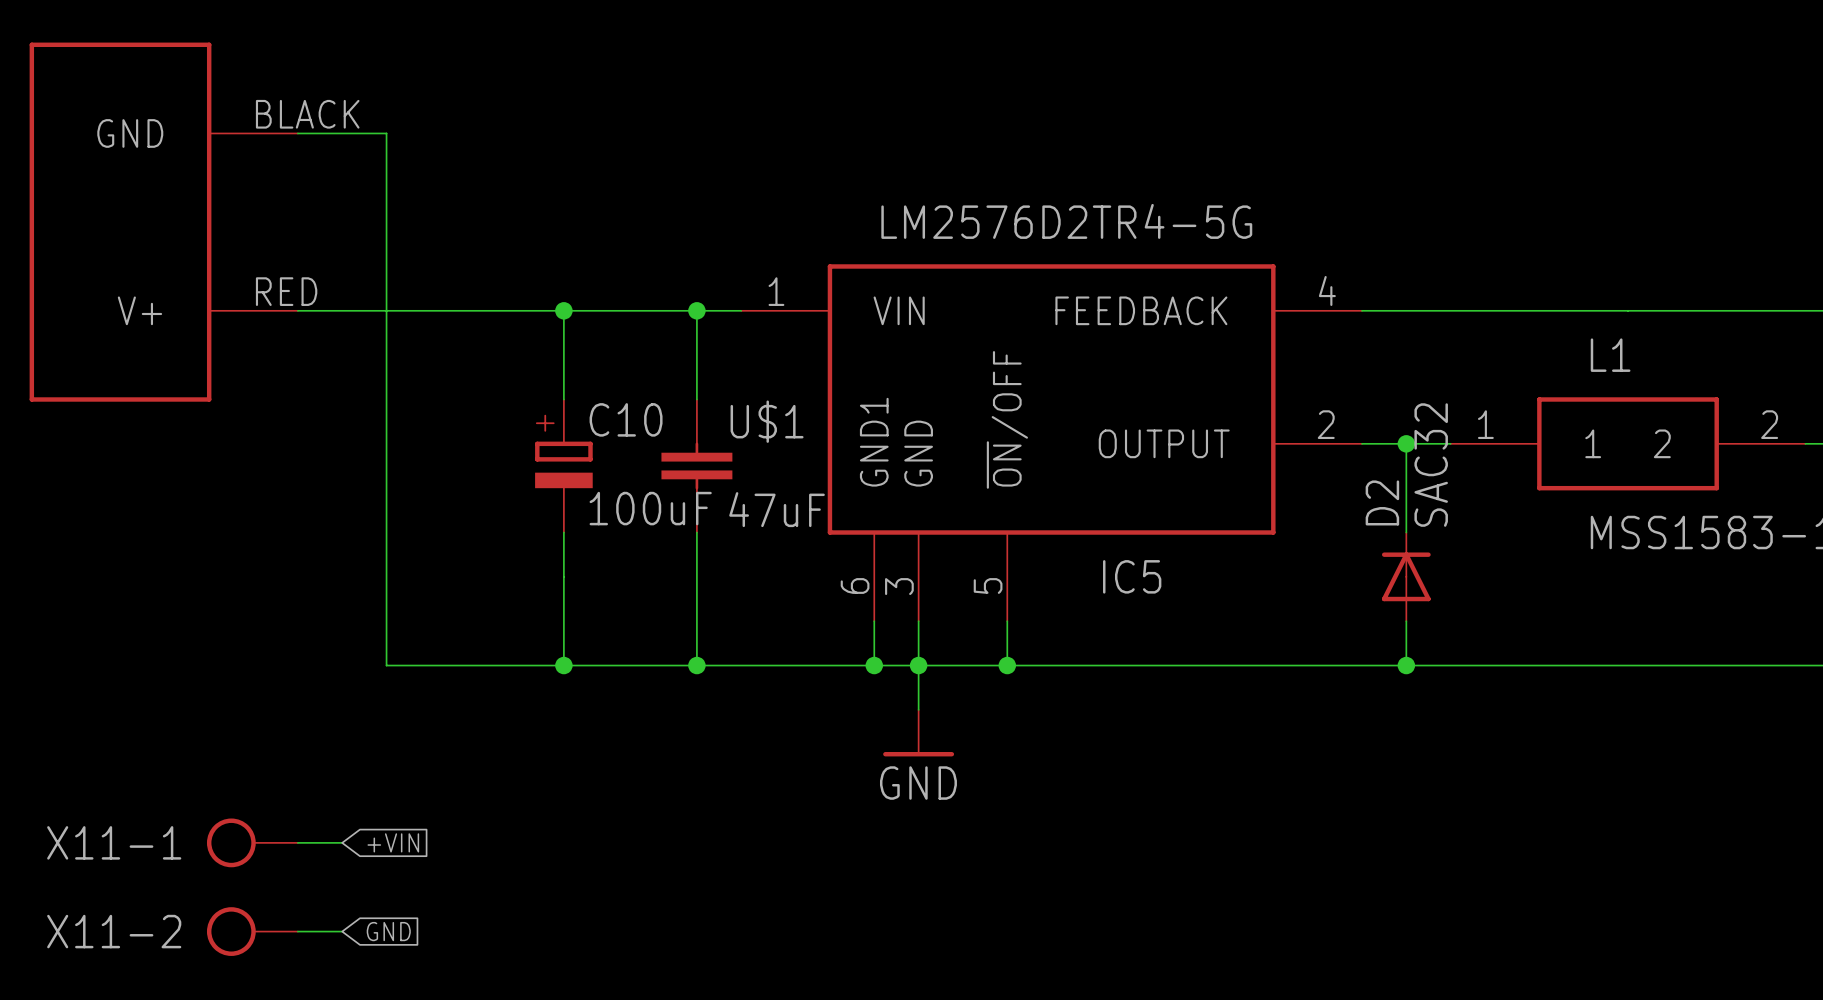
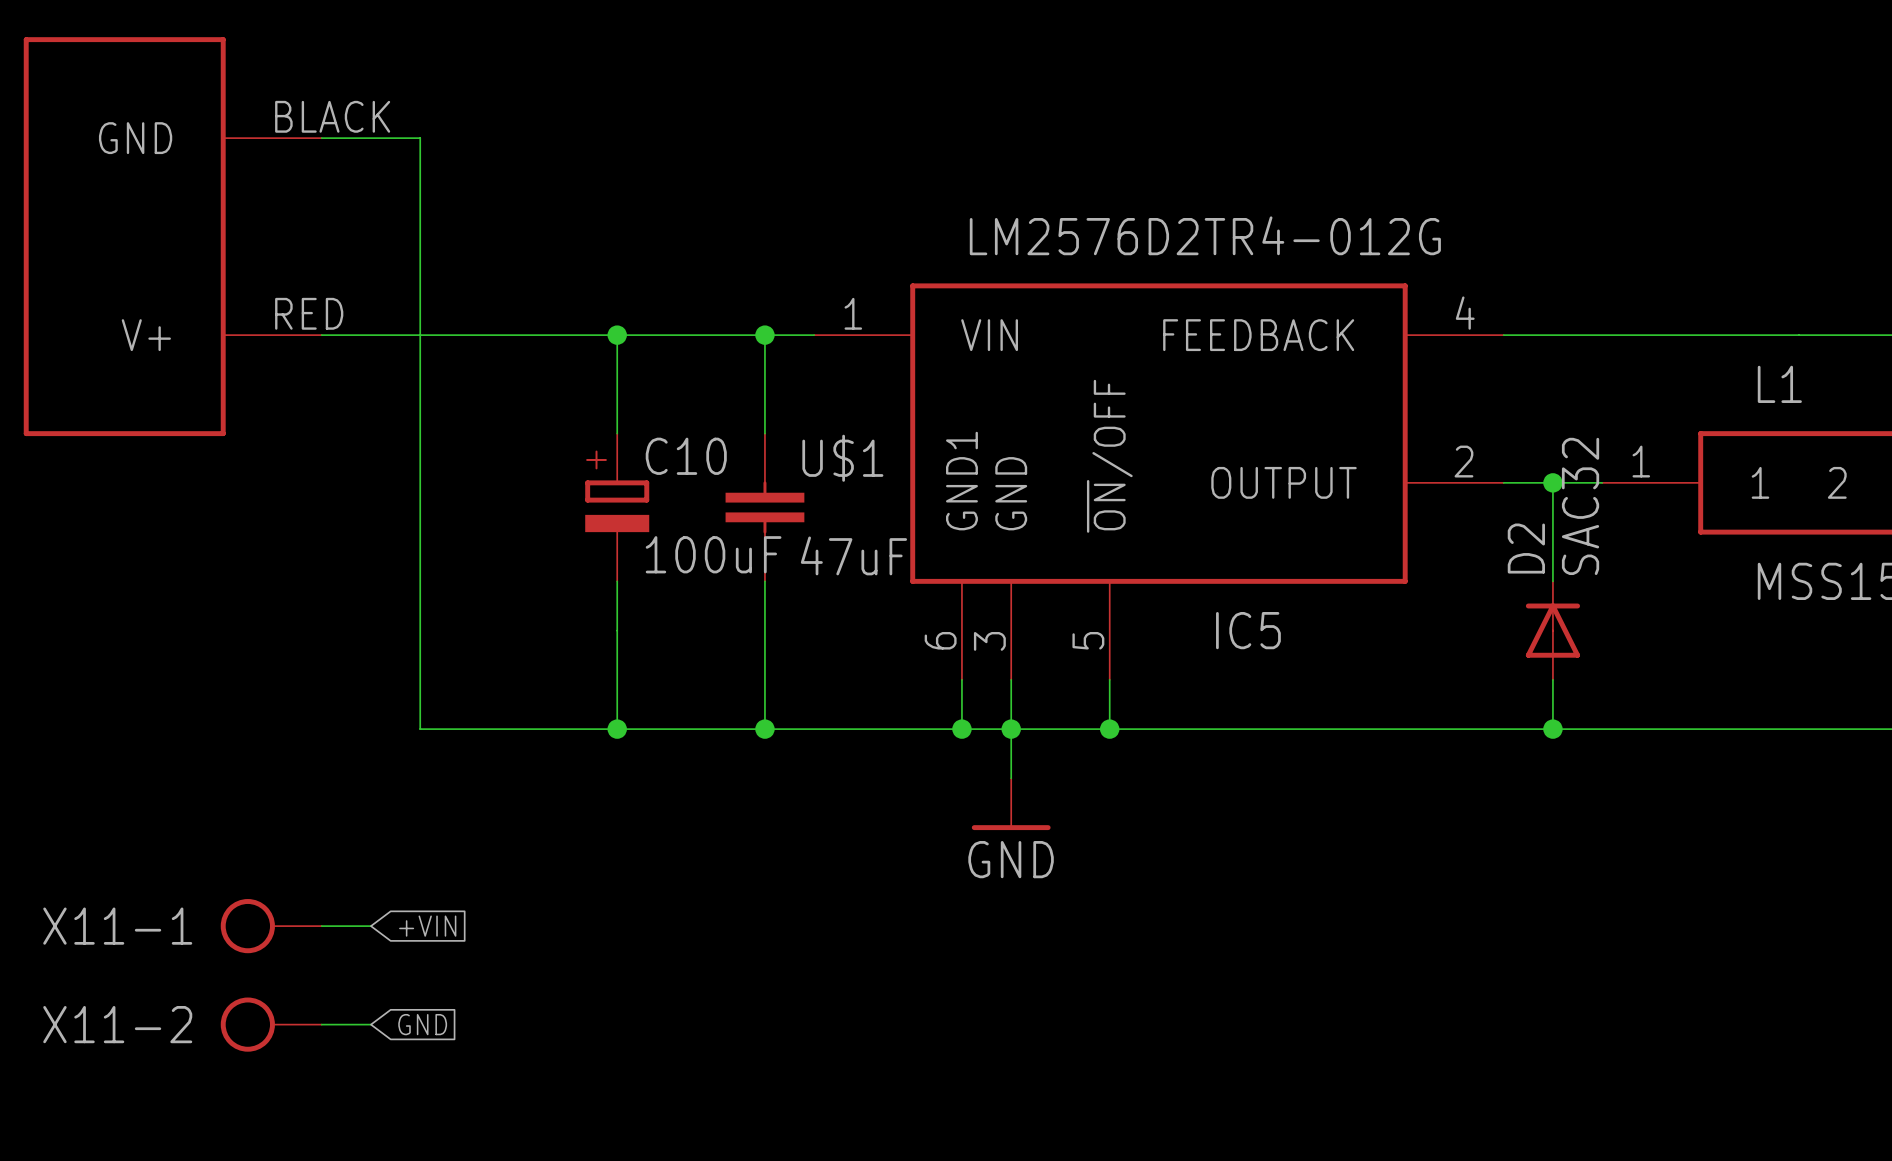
IC5 value: LM2576D2TR4-5G (1066, 221) -> LM2576D2TR4-012G (1205, 235)

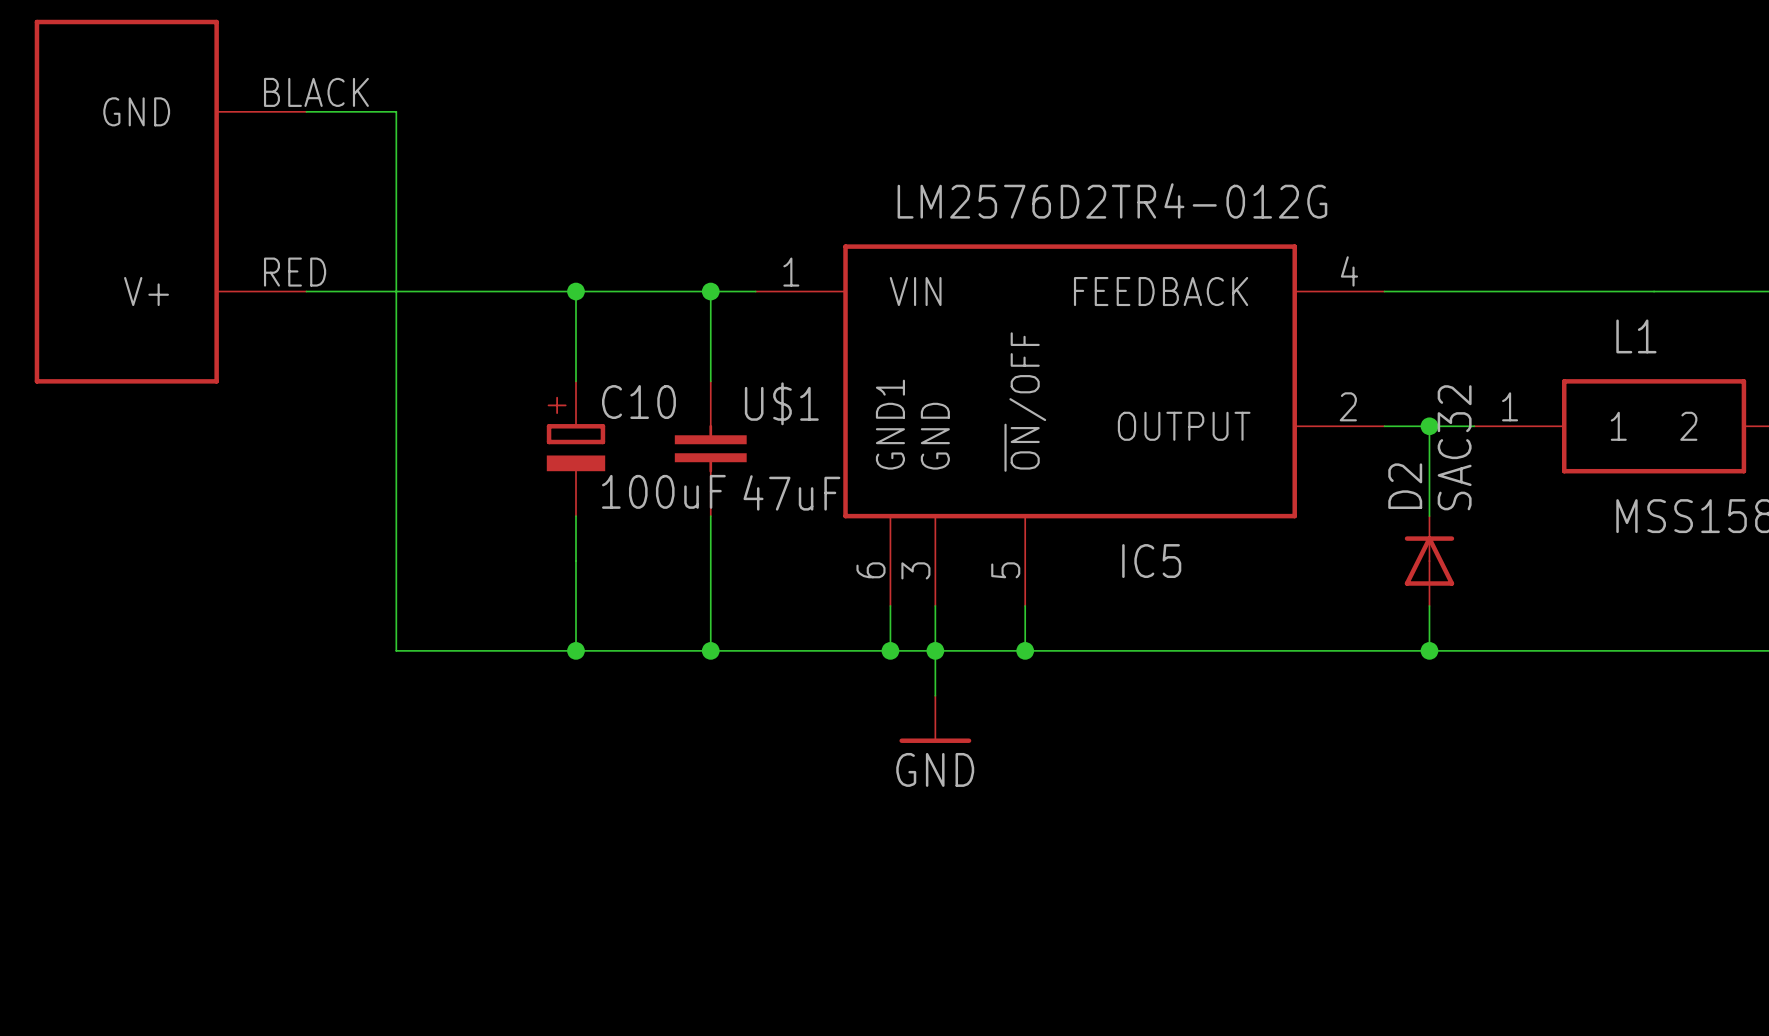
X11-1: (271, 926) -> none
wire: (321, 926) (370, 926) -> none
global label: +VIN (427, 926) -> none
X11-2: (271, 1024) -> none
wire: (321, 1024) (370, 1024) -> none
global label: GND (422, 1024) -> none

